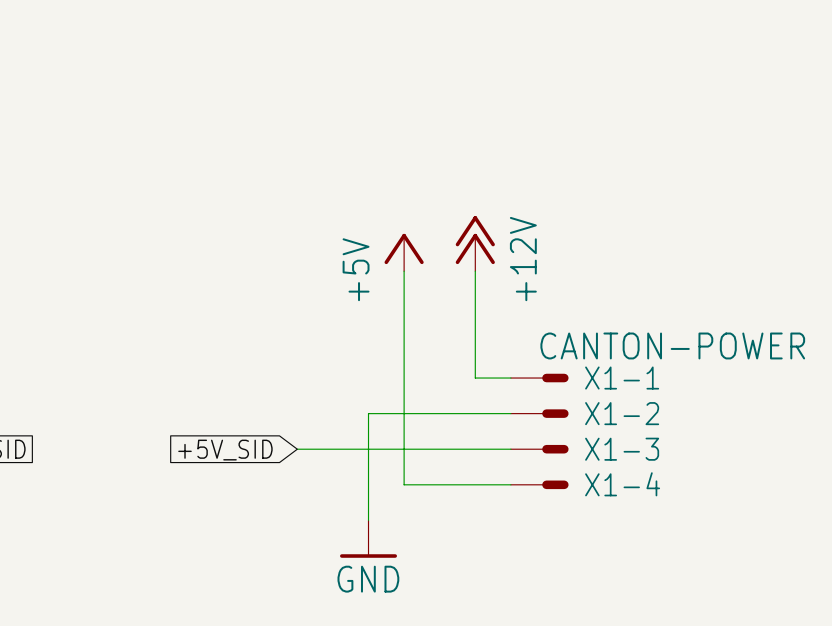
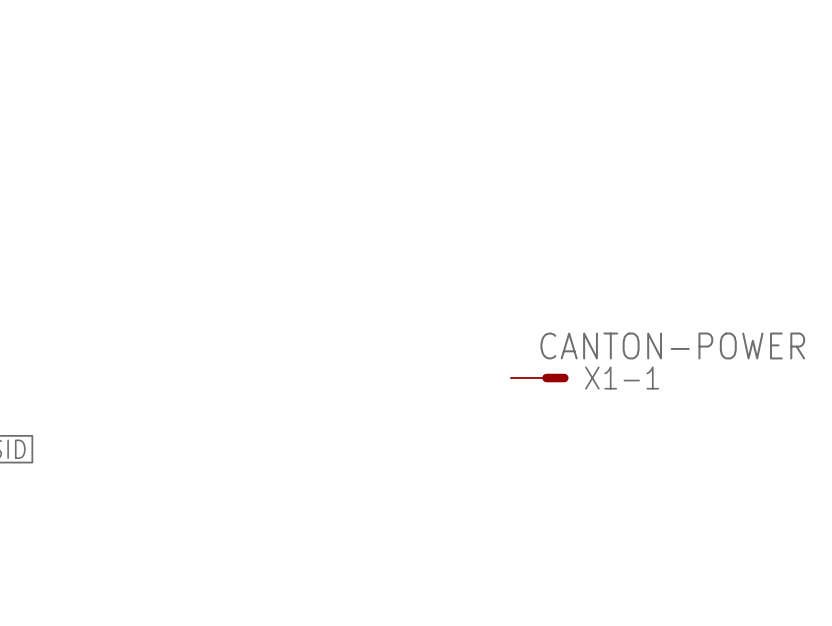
power symbol: +12V (475, 243) -> none
power symbol: +5V (404, 252) -> none
wire: (404, 271) (404, 484) (510, 484) -> none
wire: (475, 271) (475, 378) (510, 378) -> none
wire: (510, 413) (368, 413) (368, 520) -> none
X1-2: (539, 413) -> none
wire: (297, 449) (510, 449) -> none
X1-3: (539, 449) -> none
global label: +5V_SID (225, 450) -> none
X1-4: (539, 484) -> none
power symbol: GND (368, 539) -> none

